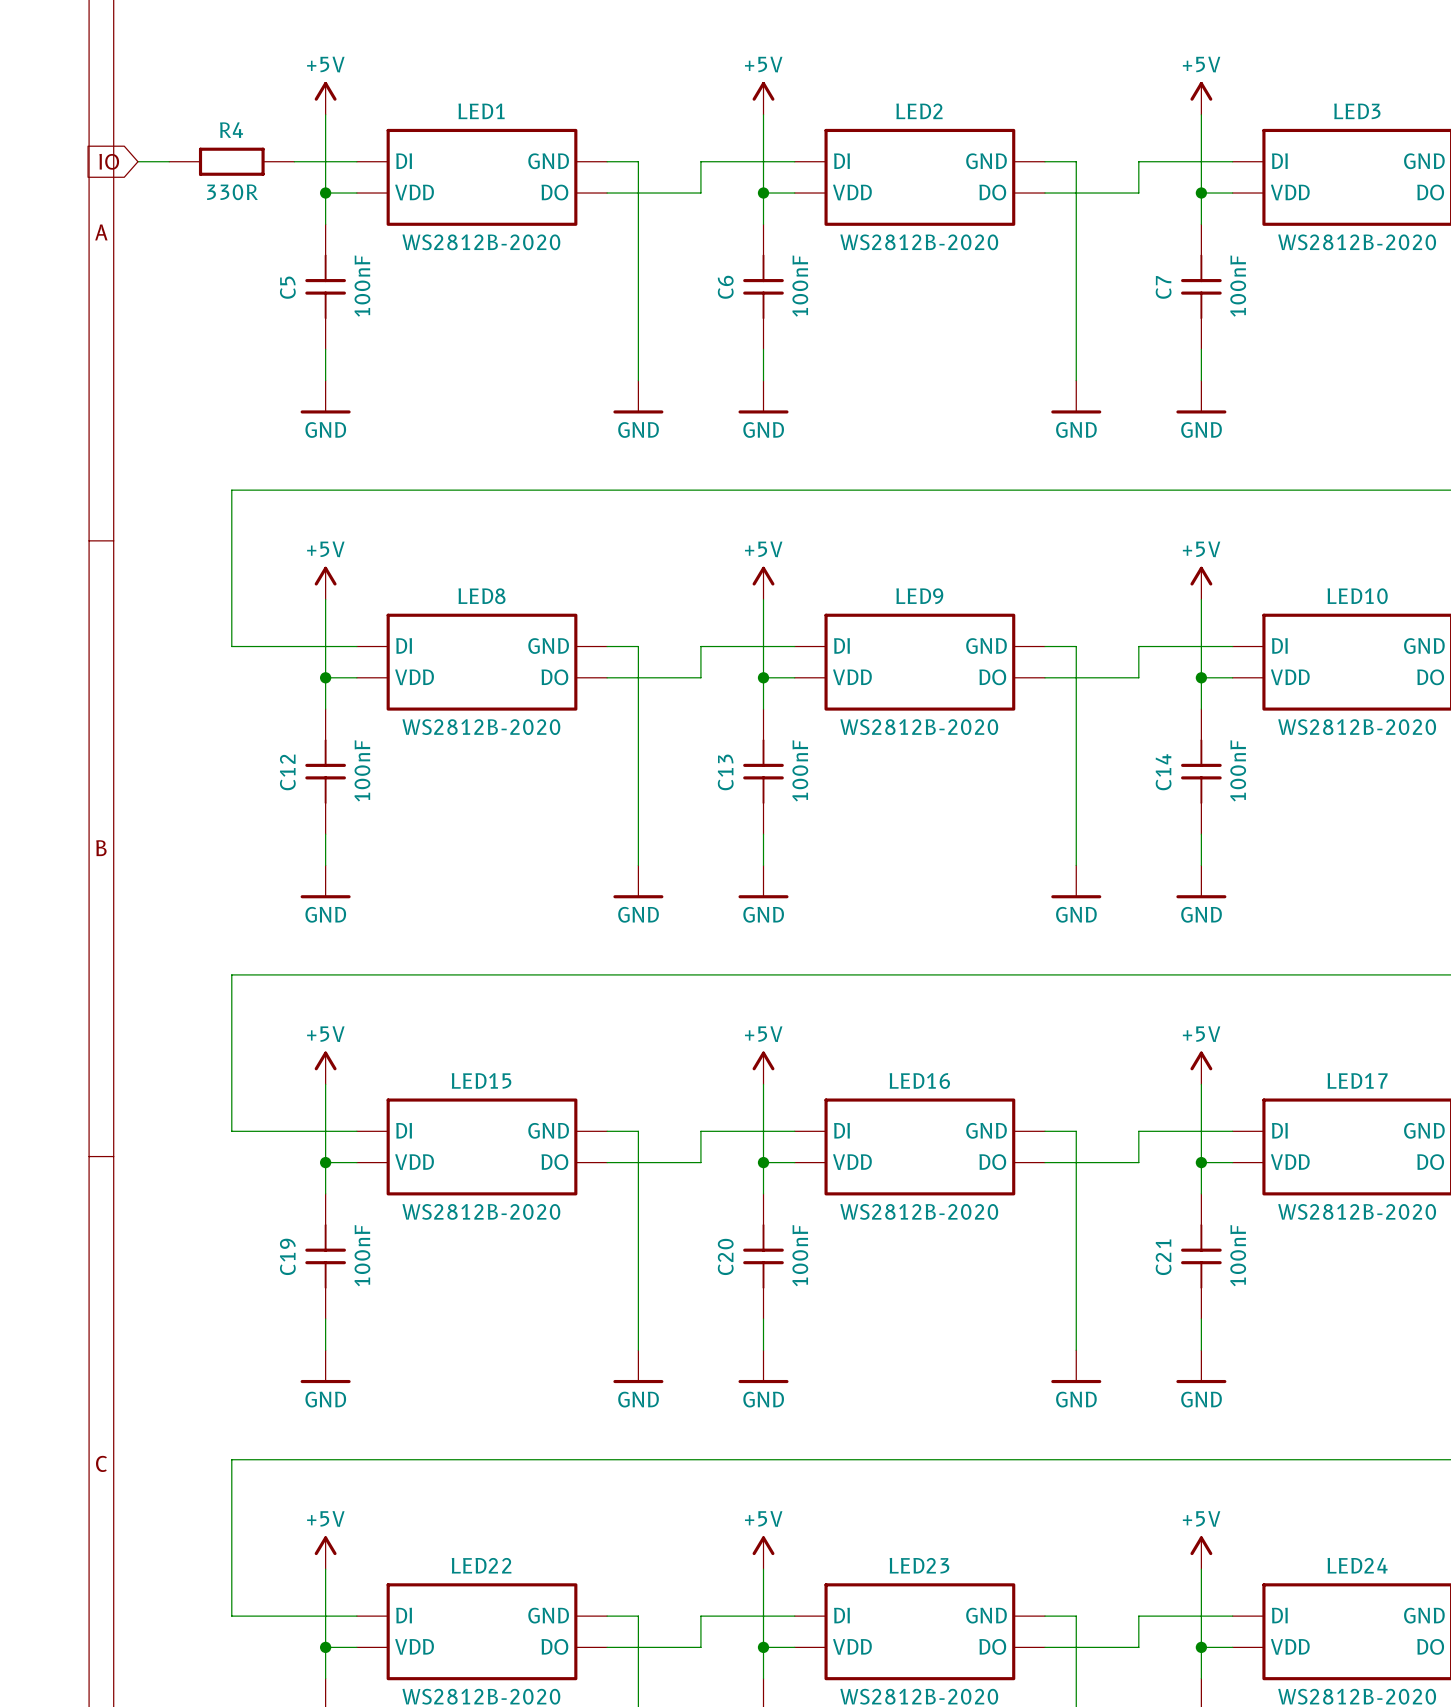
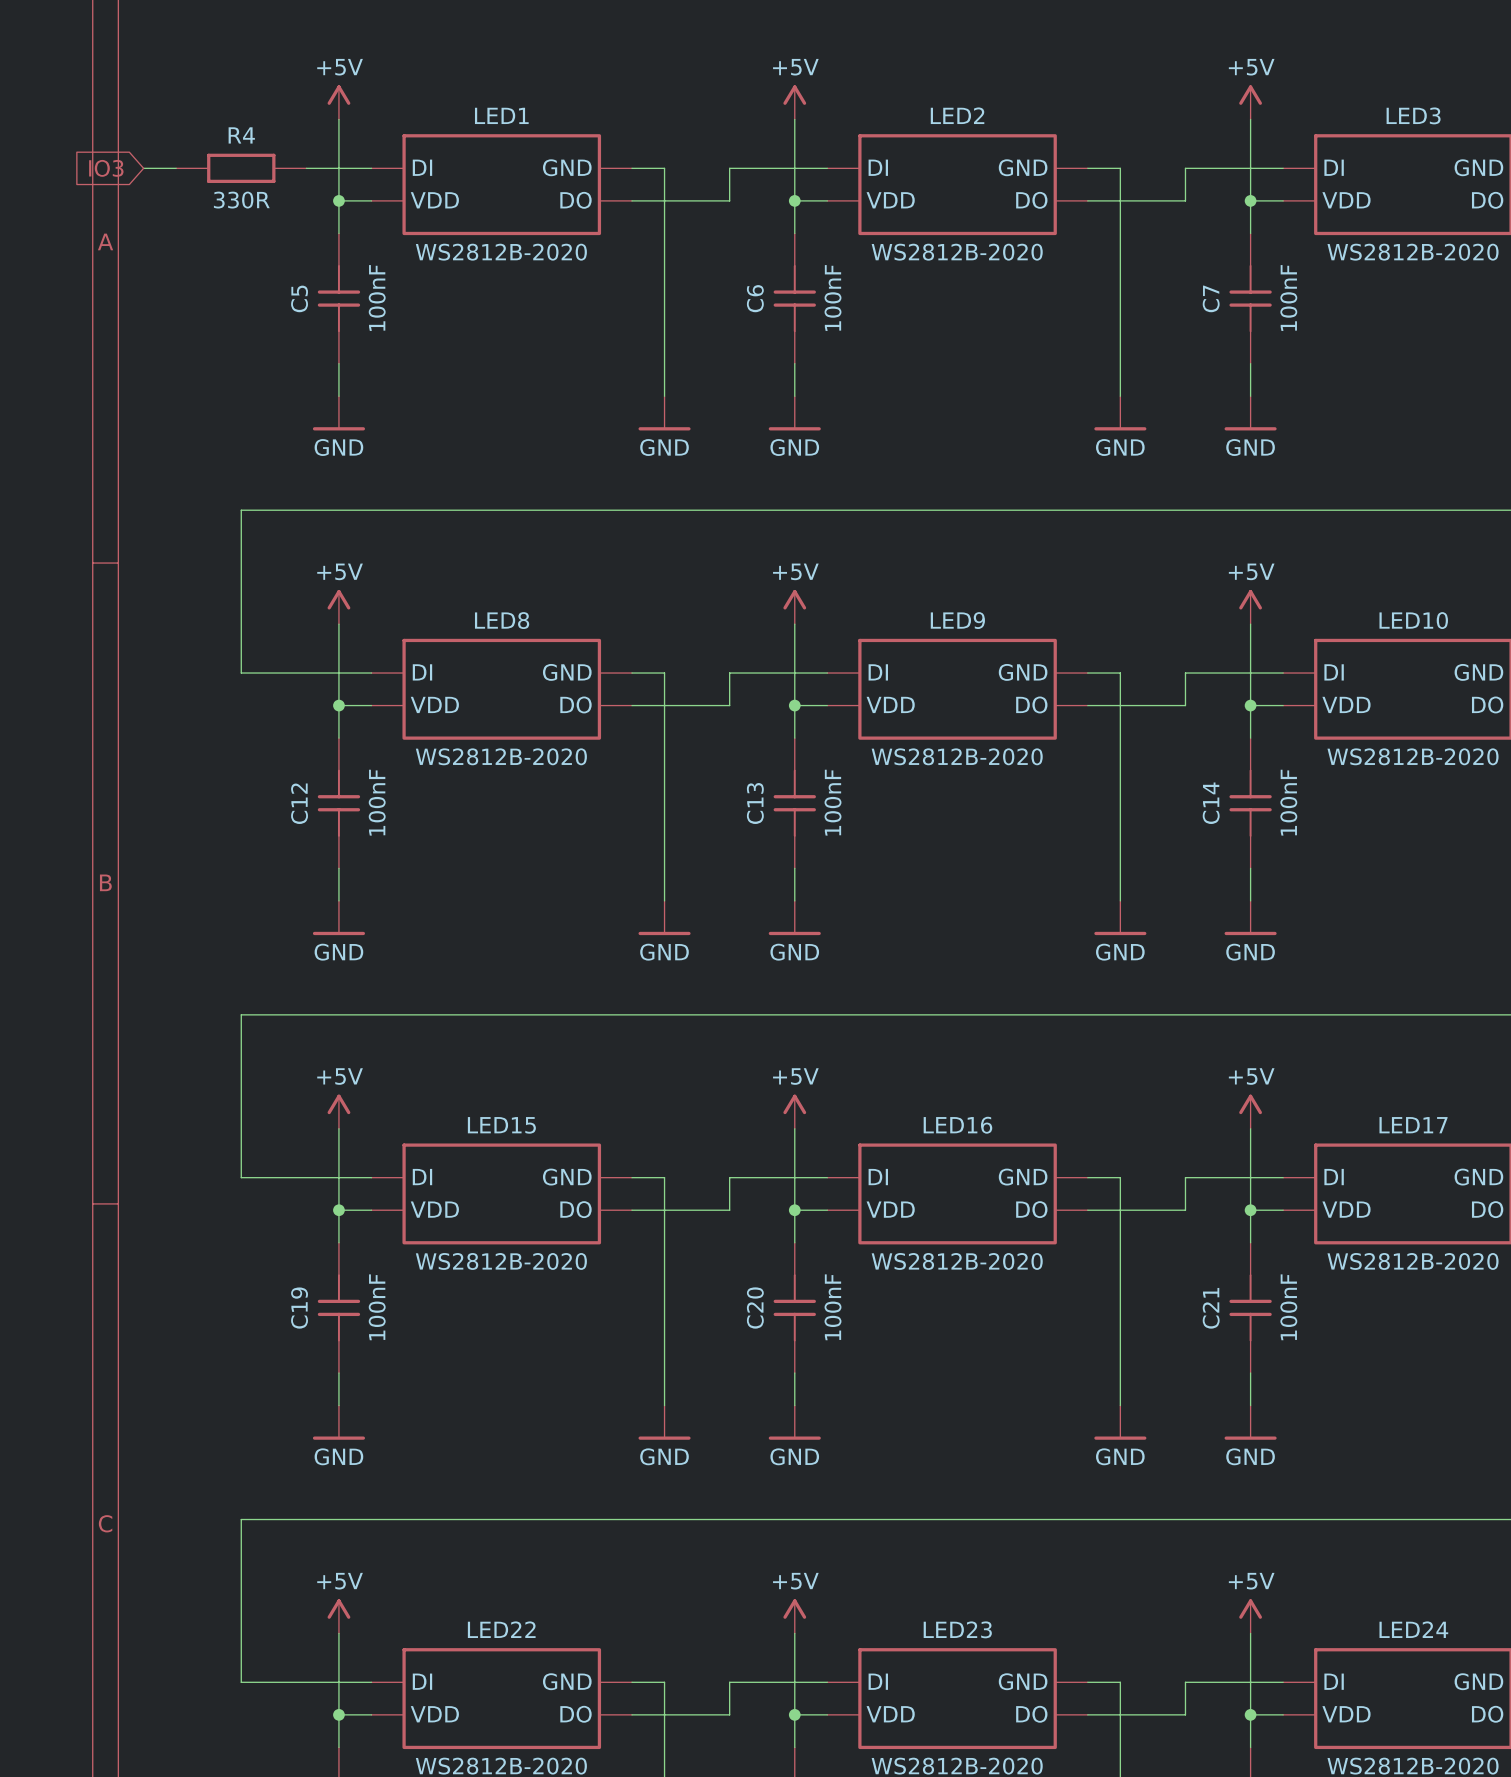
global label: IO (109, 161) -> IO3 (106, 168)

